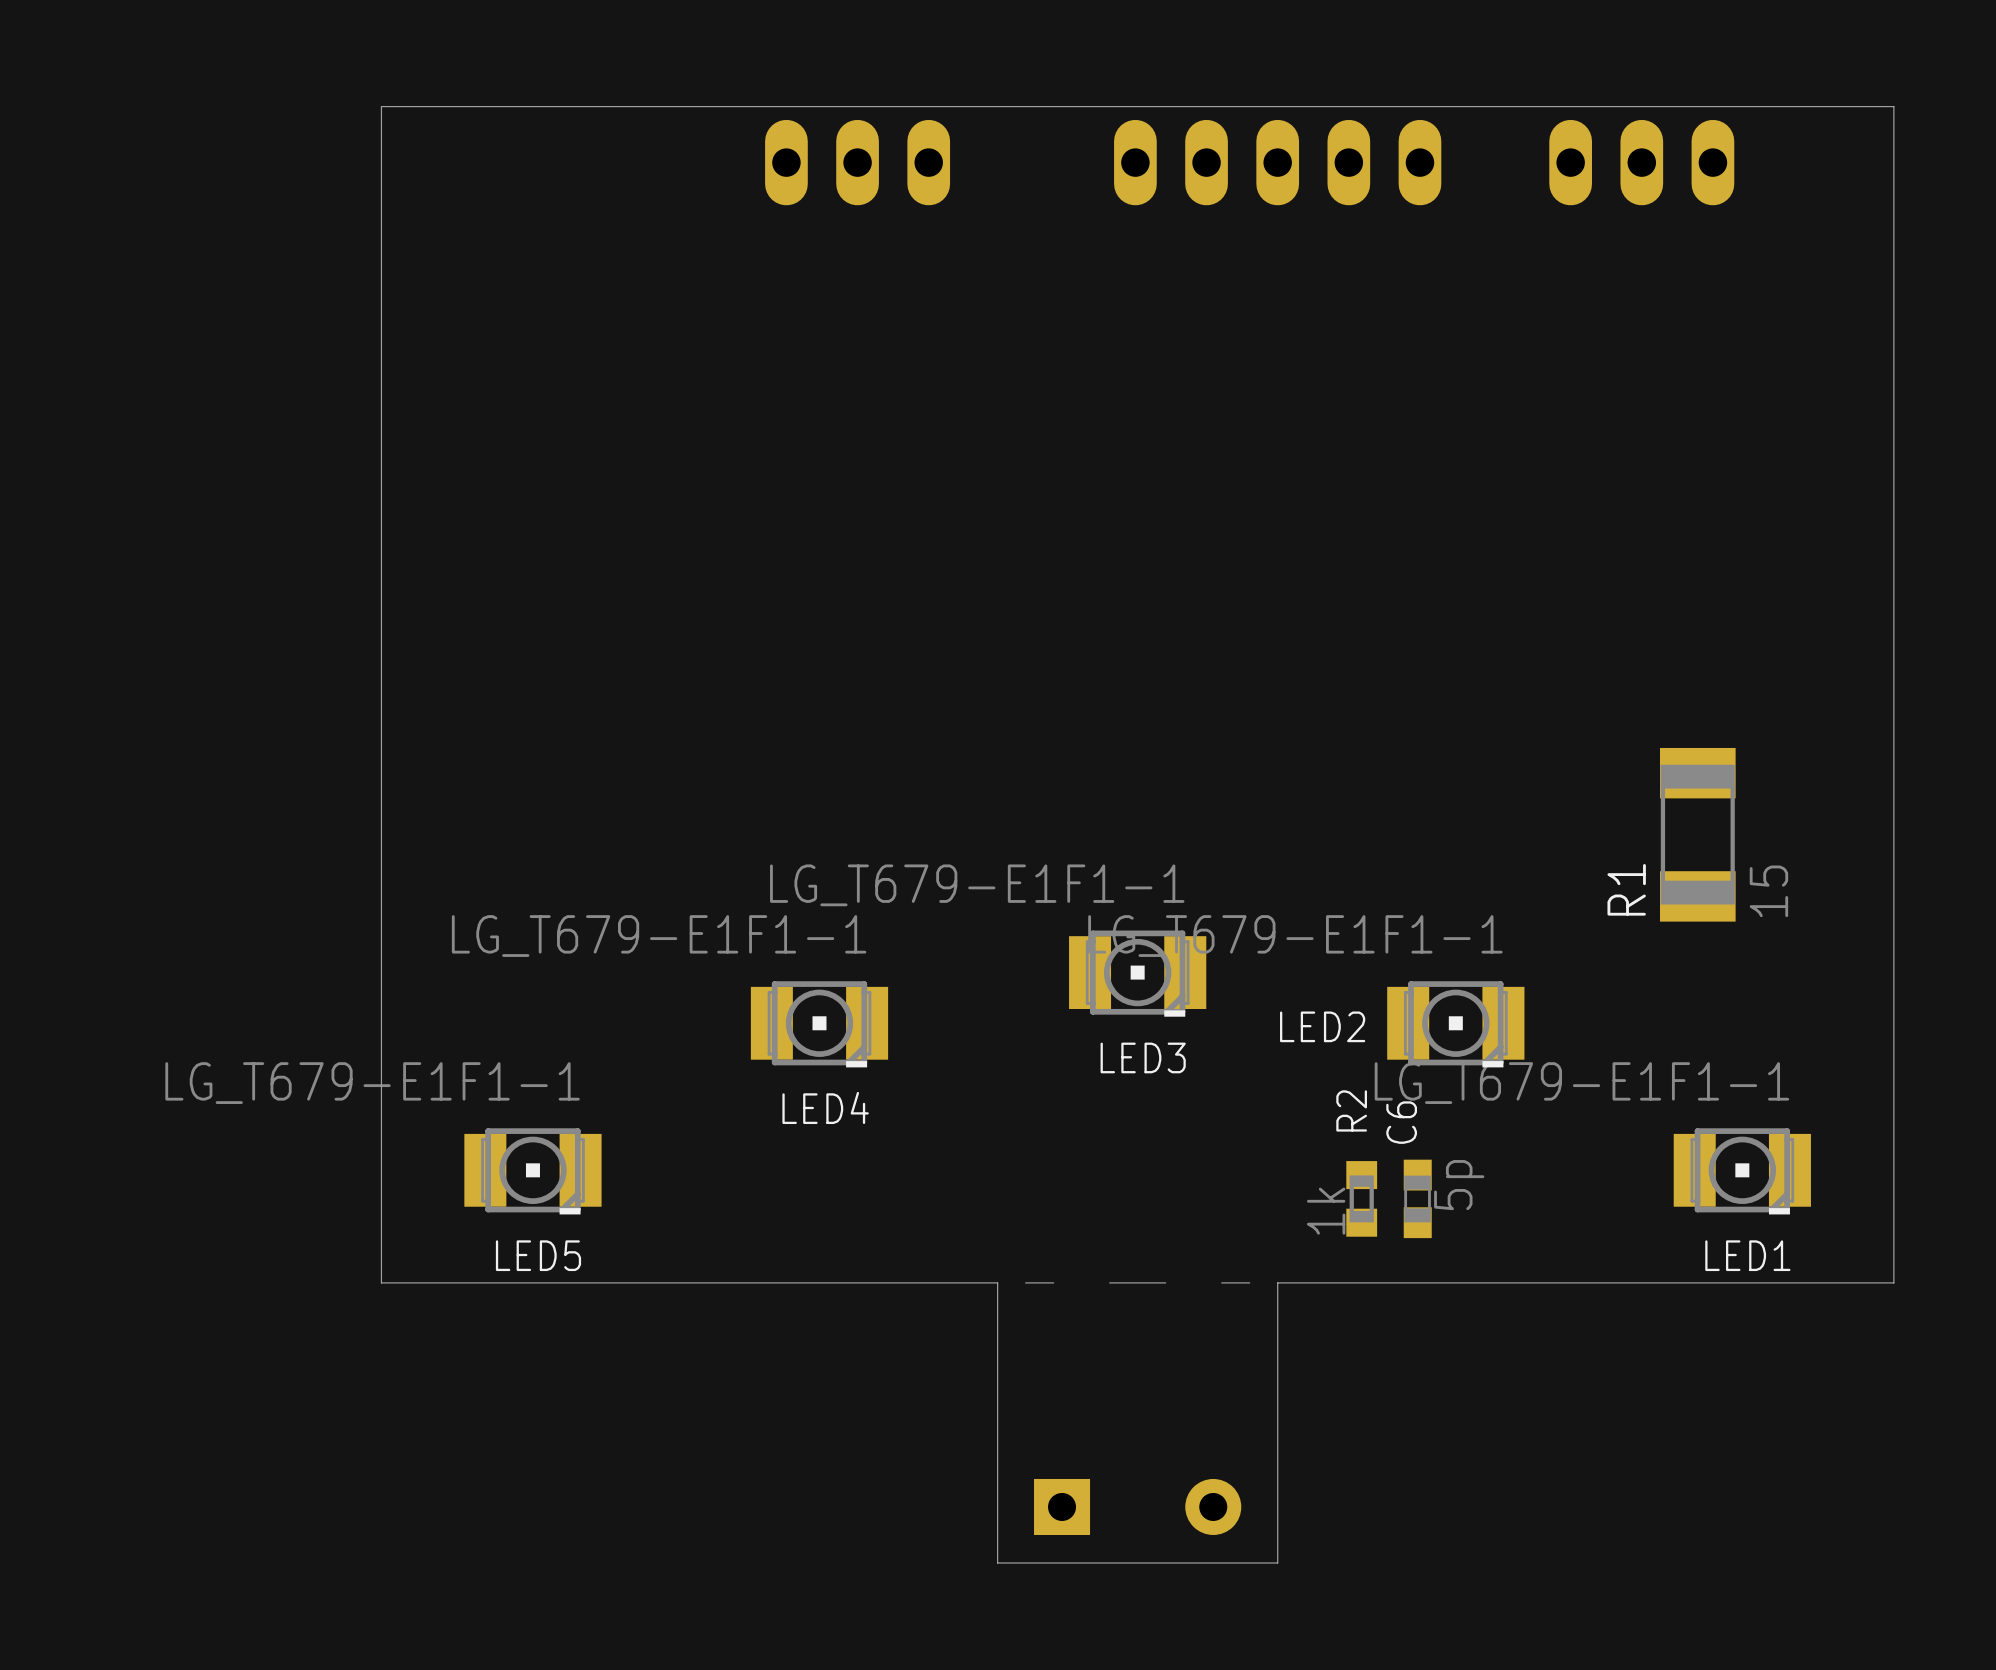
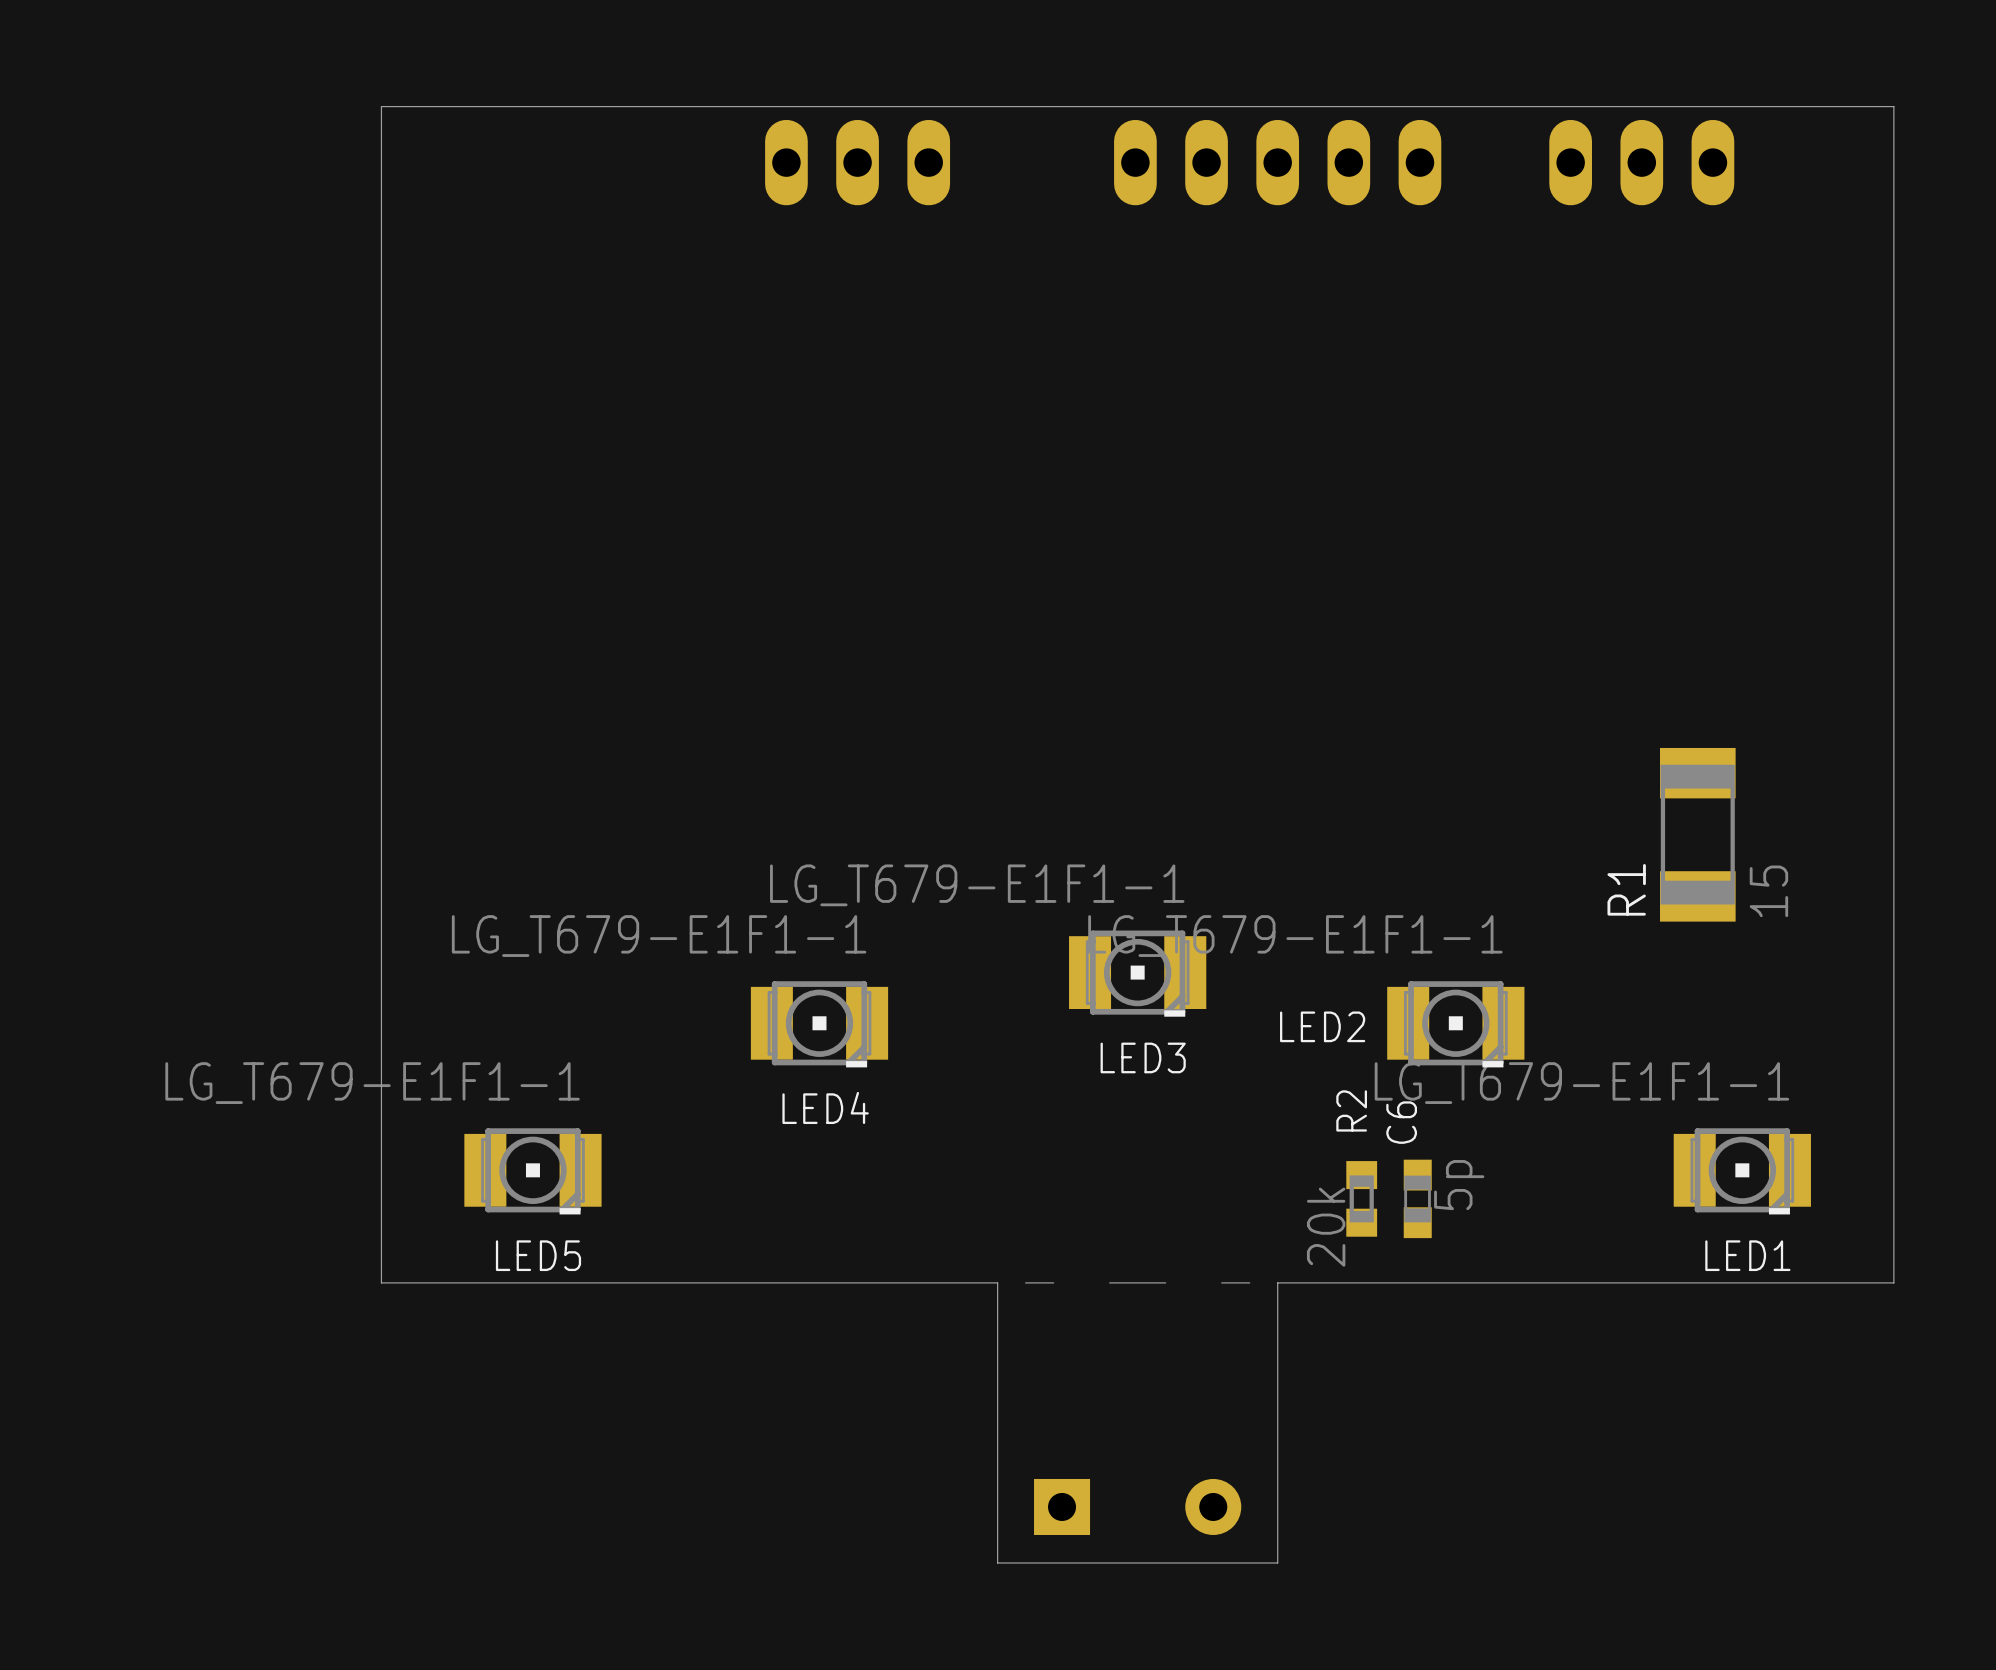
R2 value: 1k (1326, 1211) -> 20k (1326, 1227)

